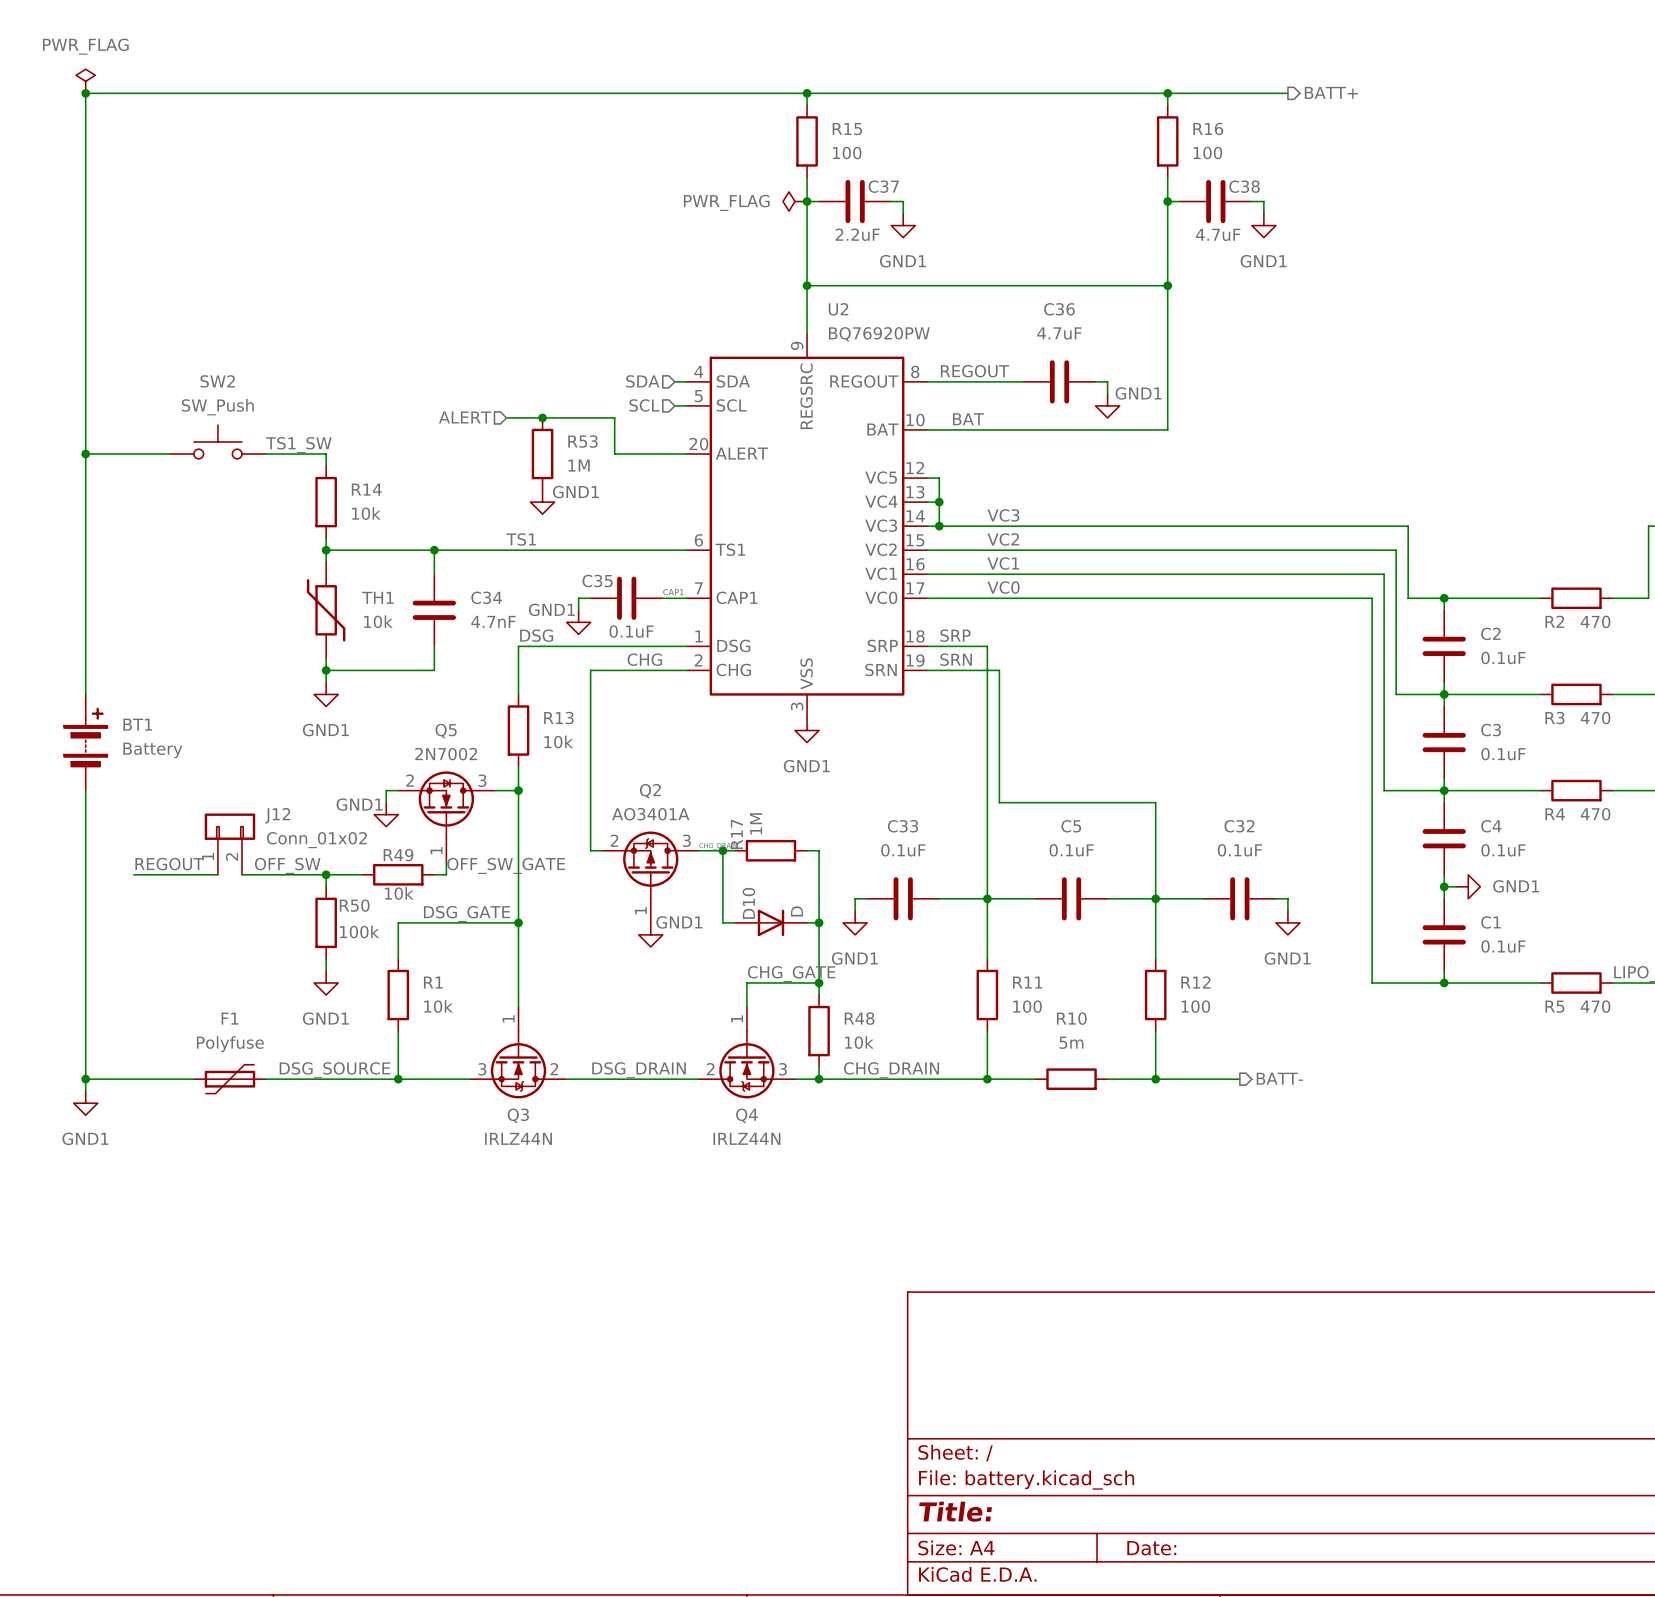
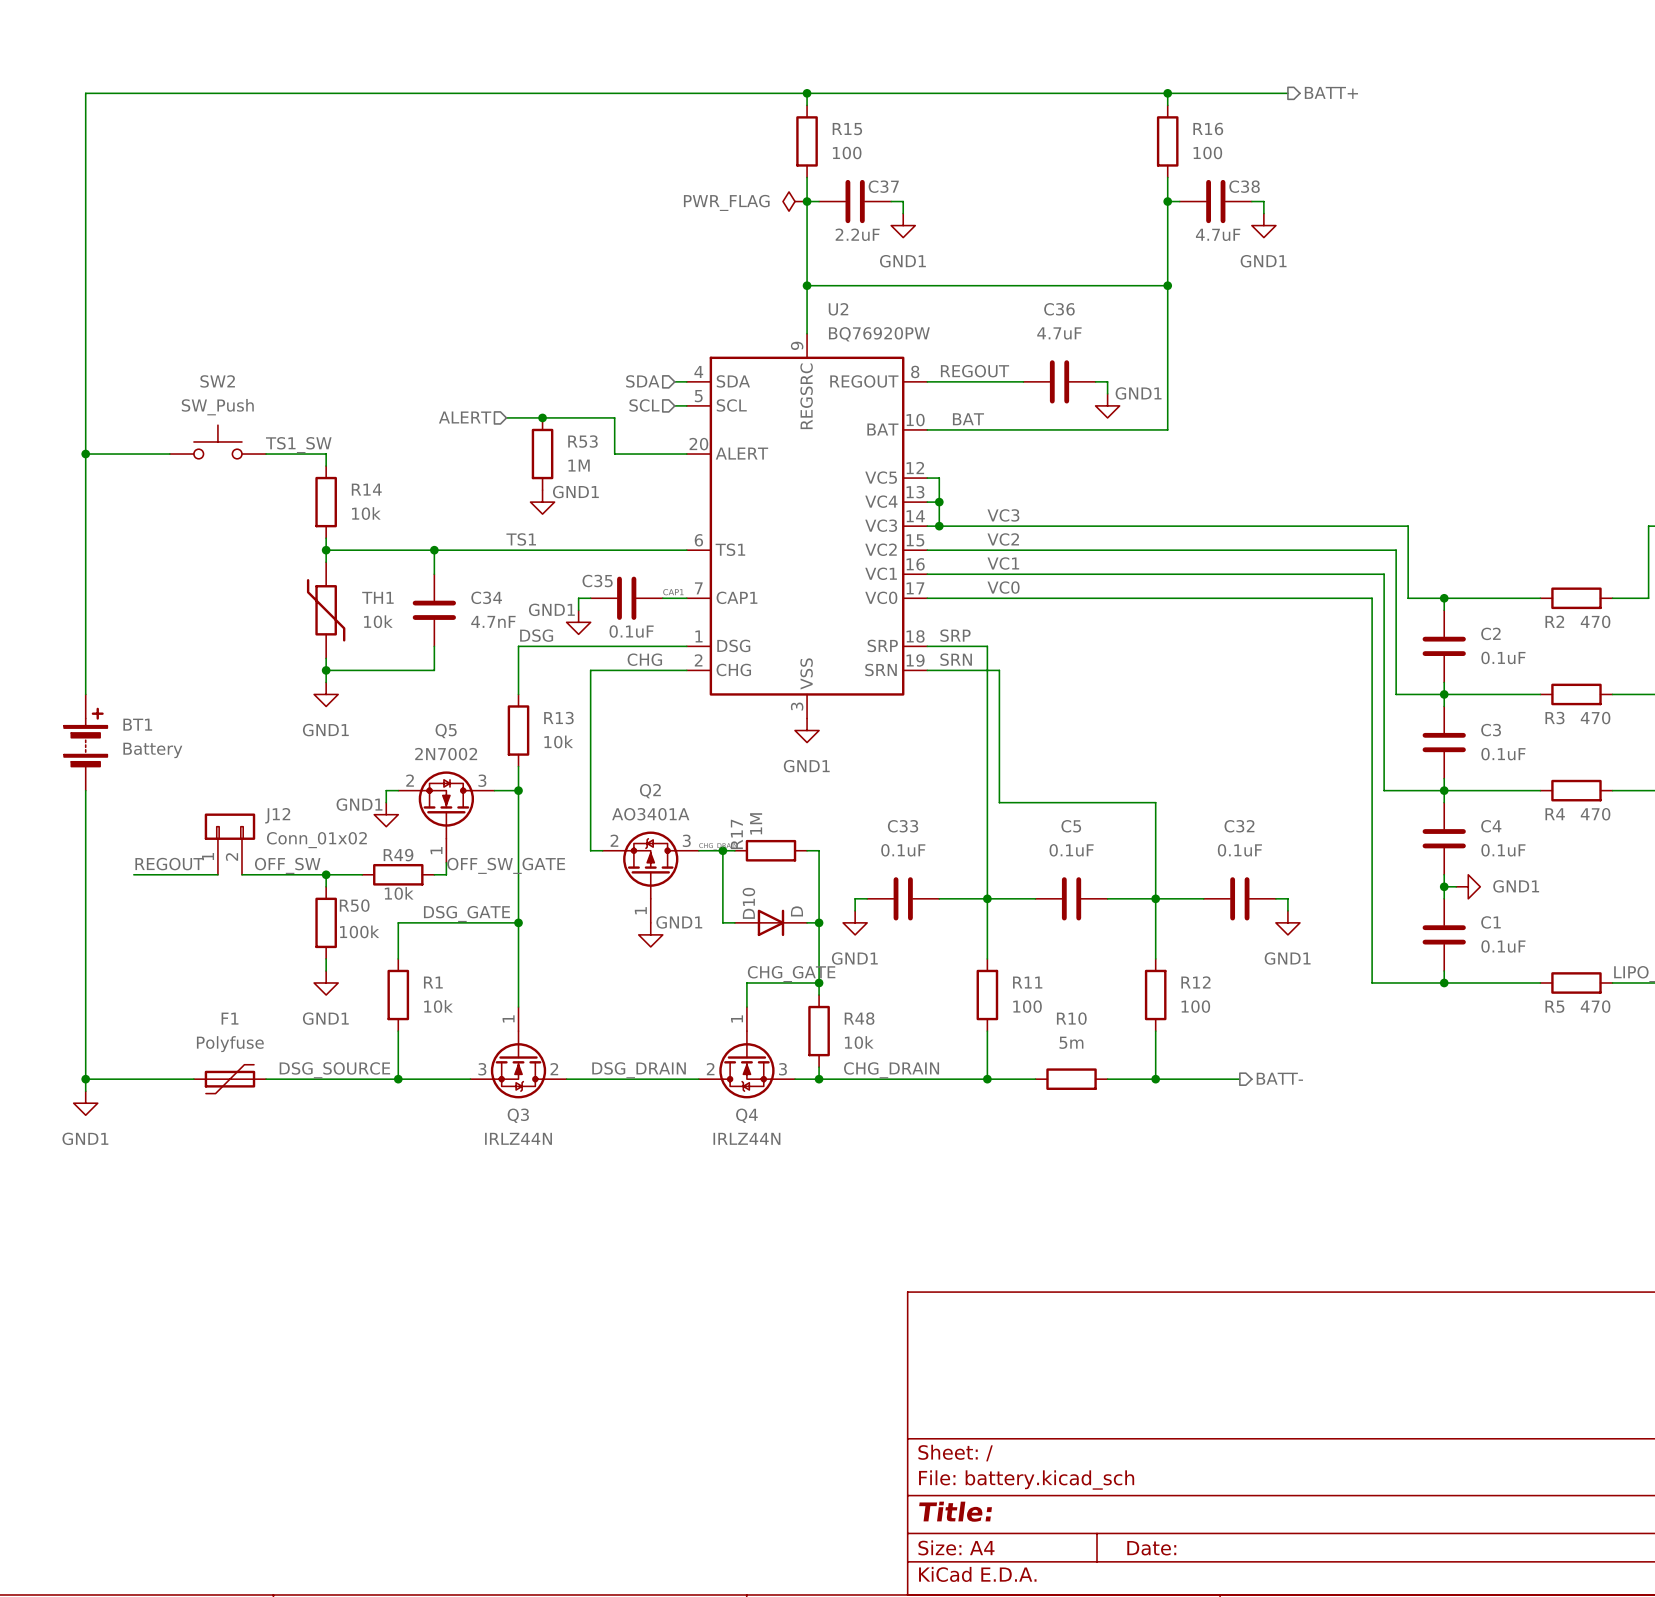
power symbol: PWR_FLAG (85, 81) -> none
junction: (85, 93) -> none

